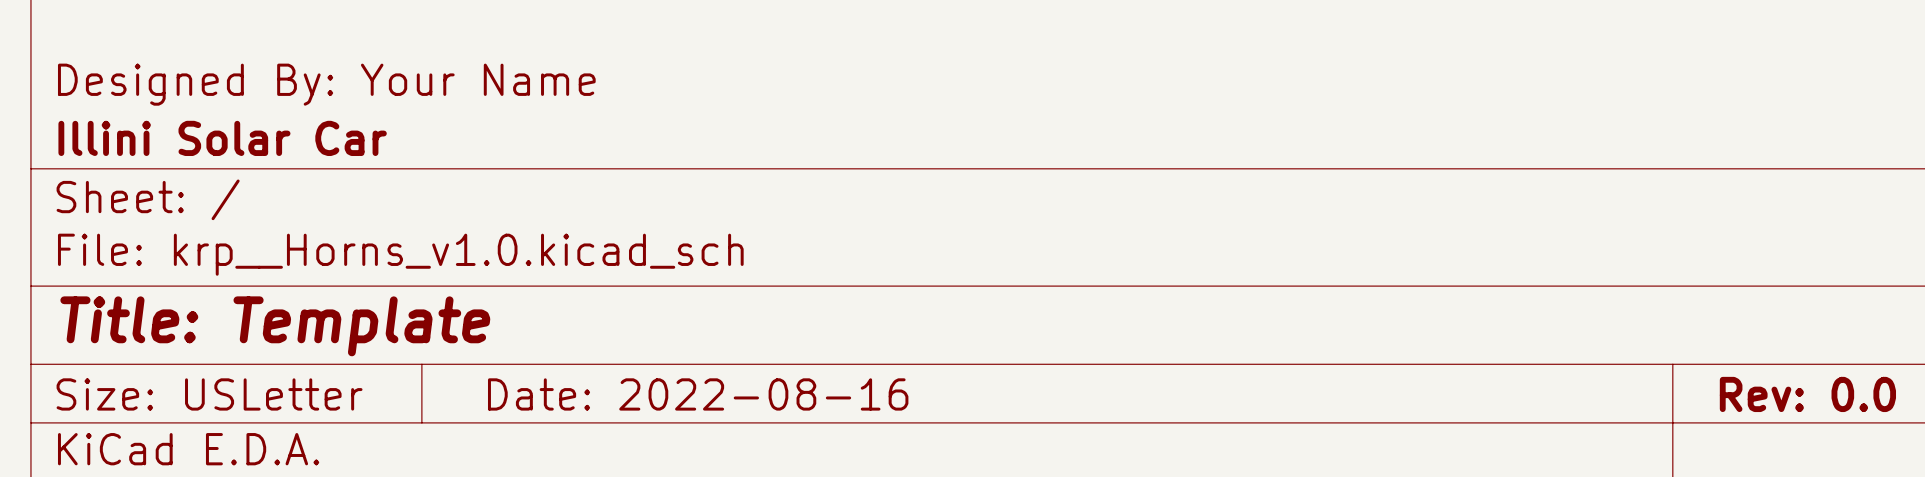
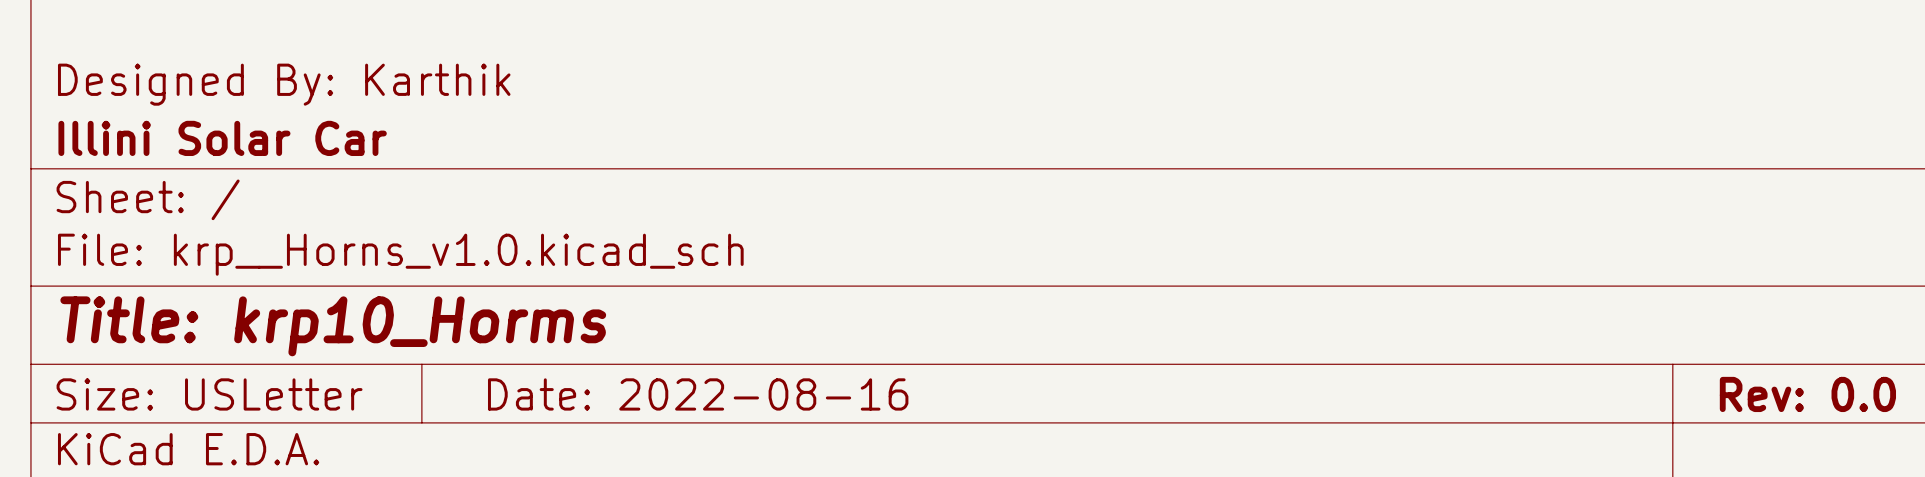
title block: Designed By: Your Name (326, 84) -> Designed By: Karthik (284, 84)
title block: Title: Template (275, 326) -> Title: krp10_Horms (333, 326)

